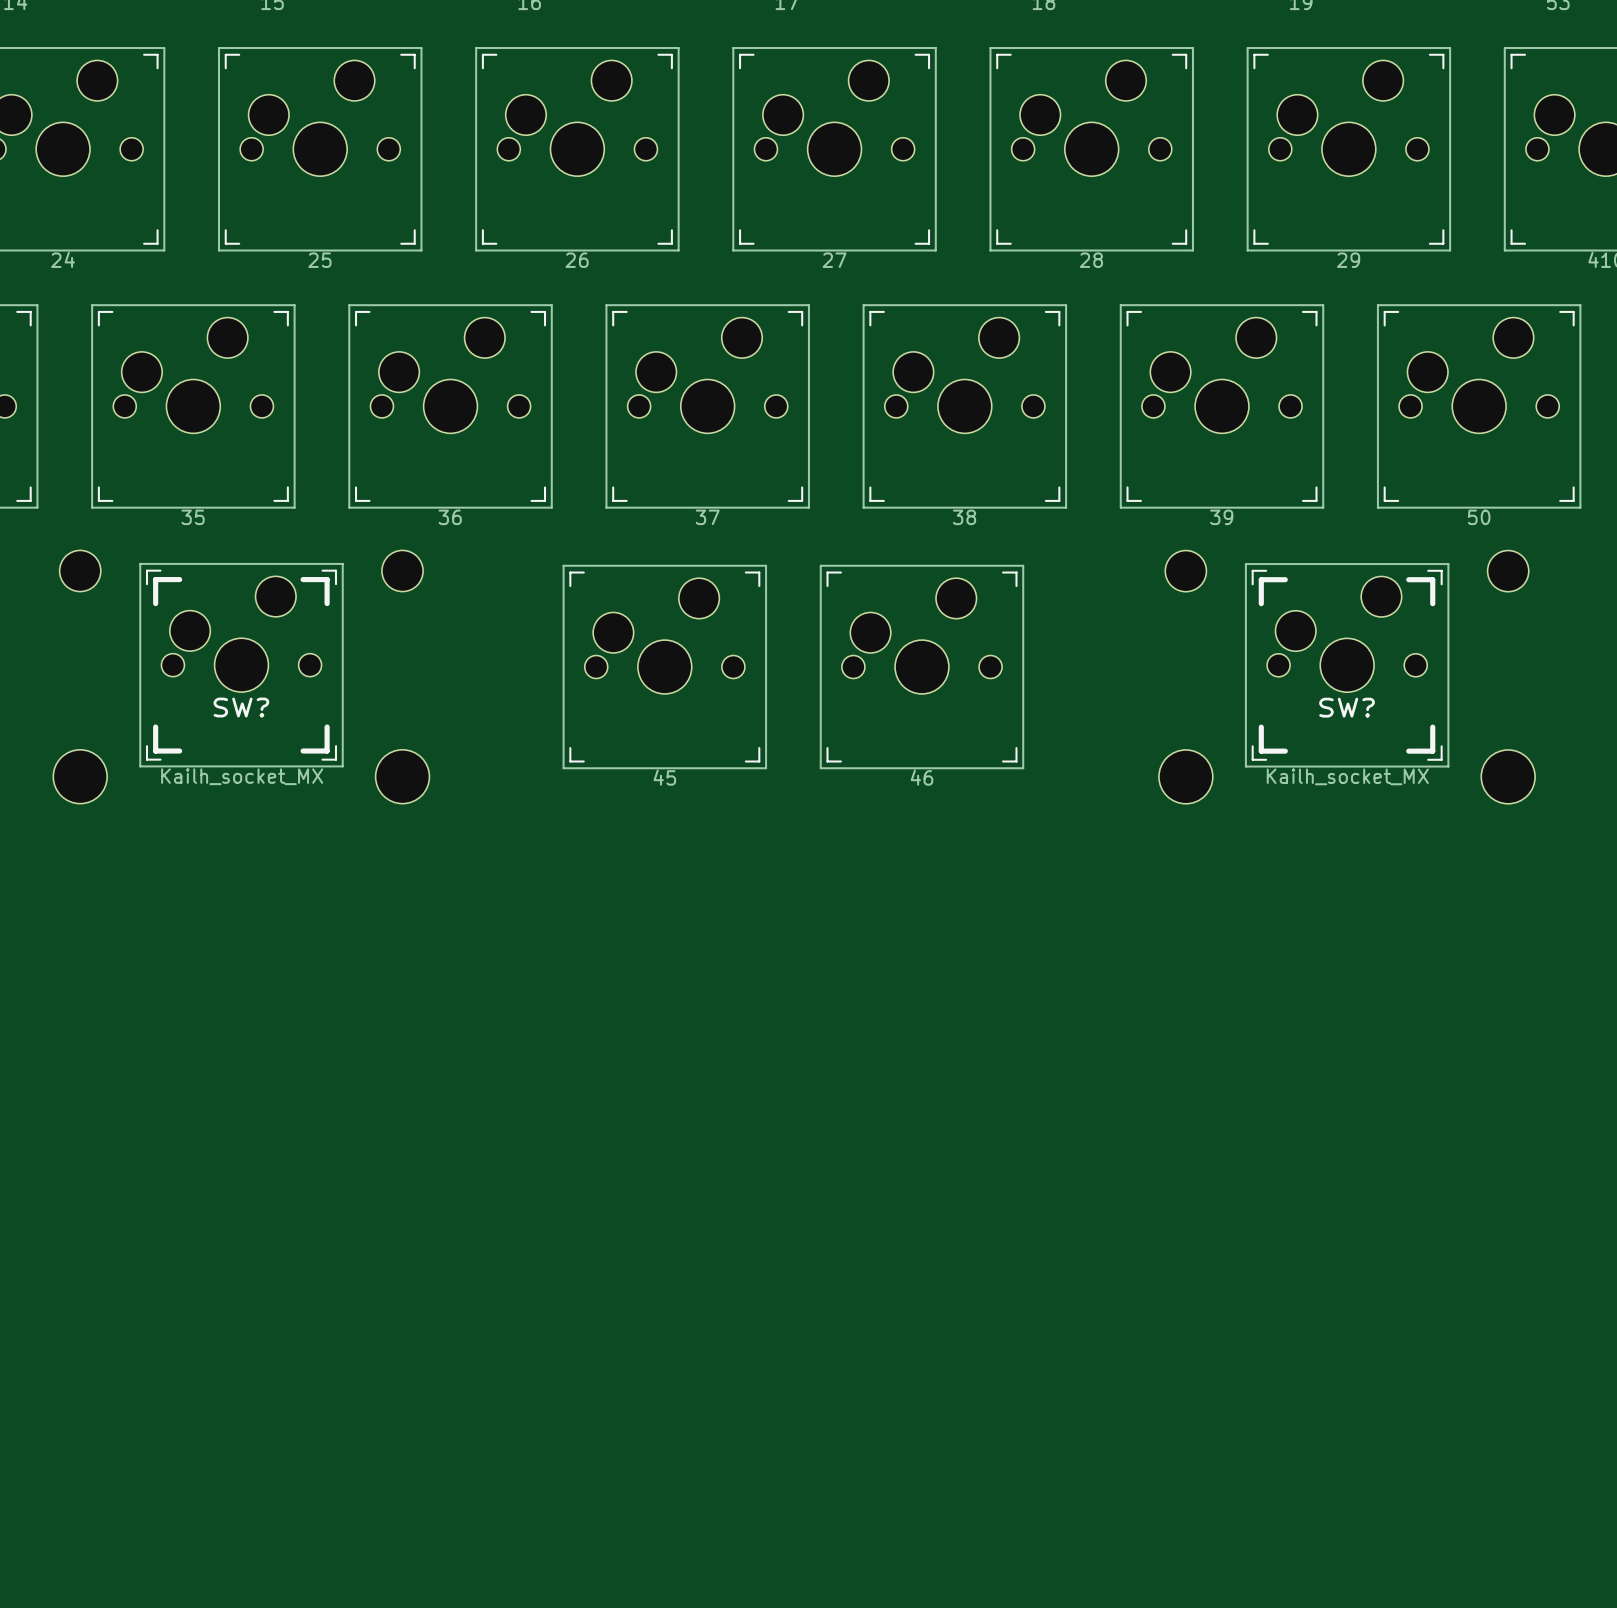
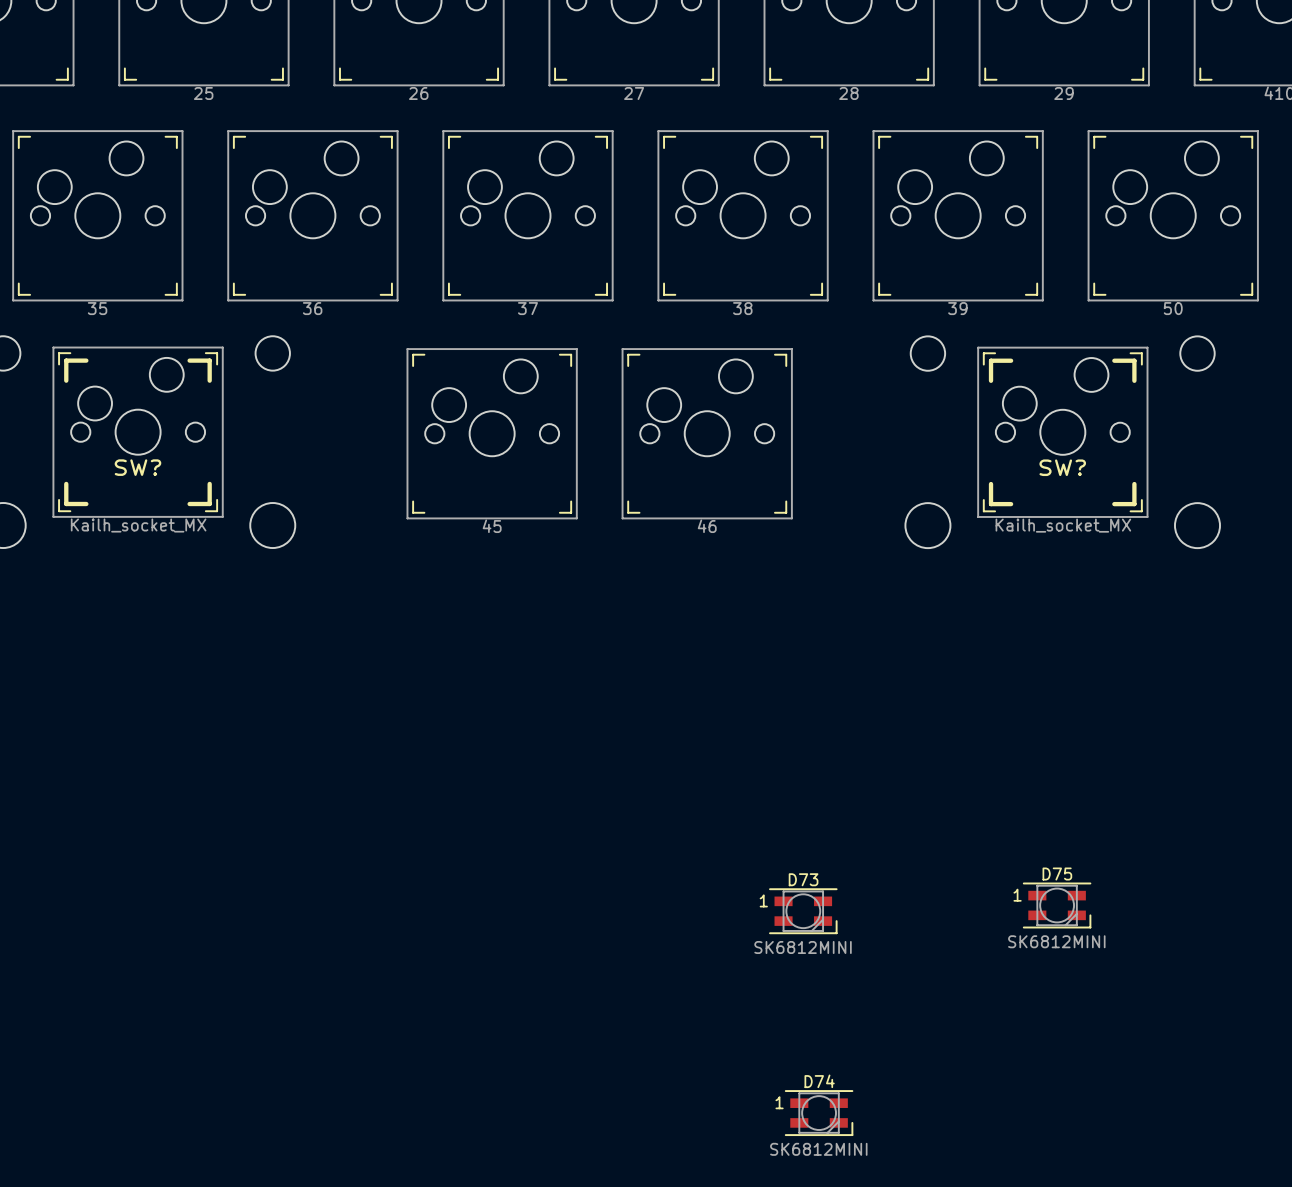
D75: none -> SK6812MINI (1057, 905)
D73: none -> SK6812MINI (803, 911)
D74: none -> SK6812MINI (819, 1113)

